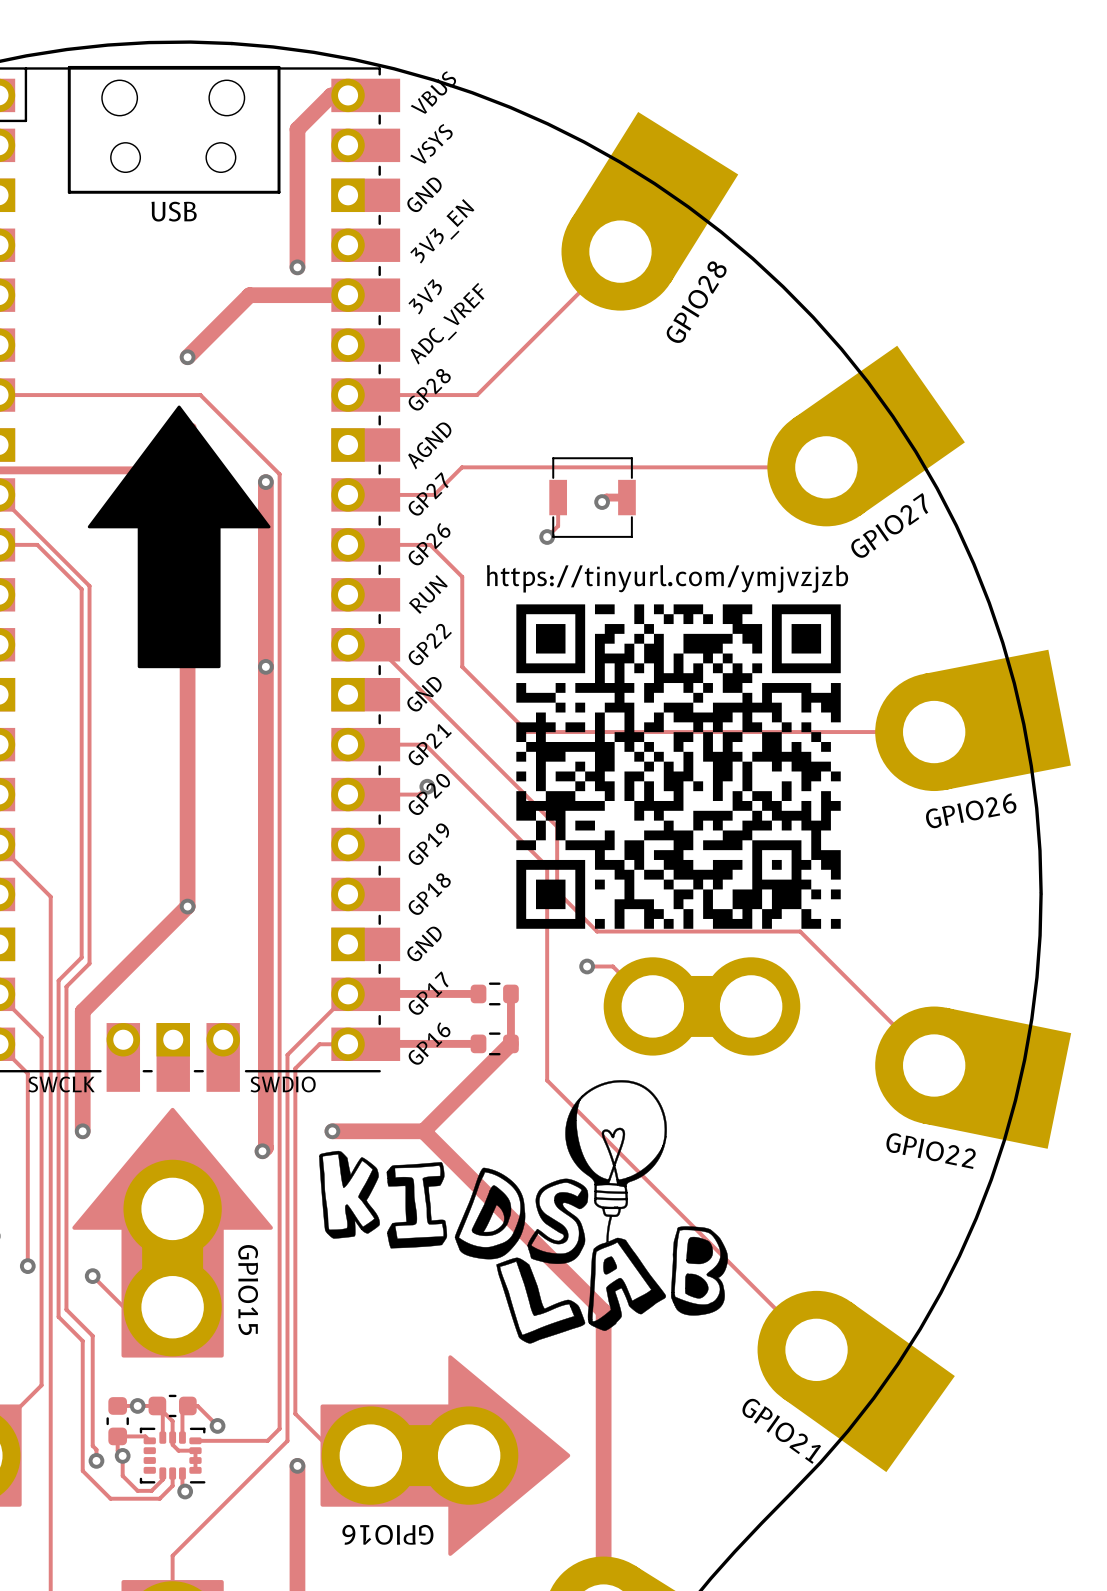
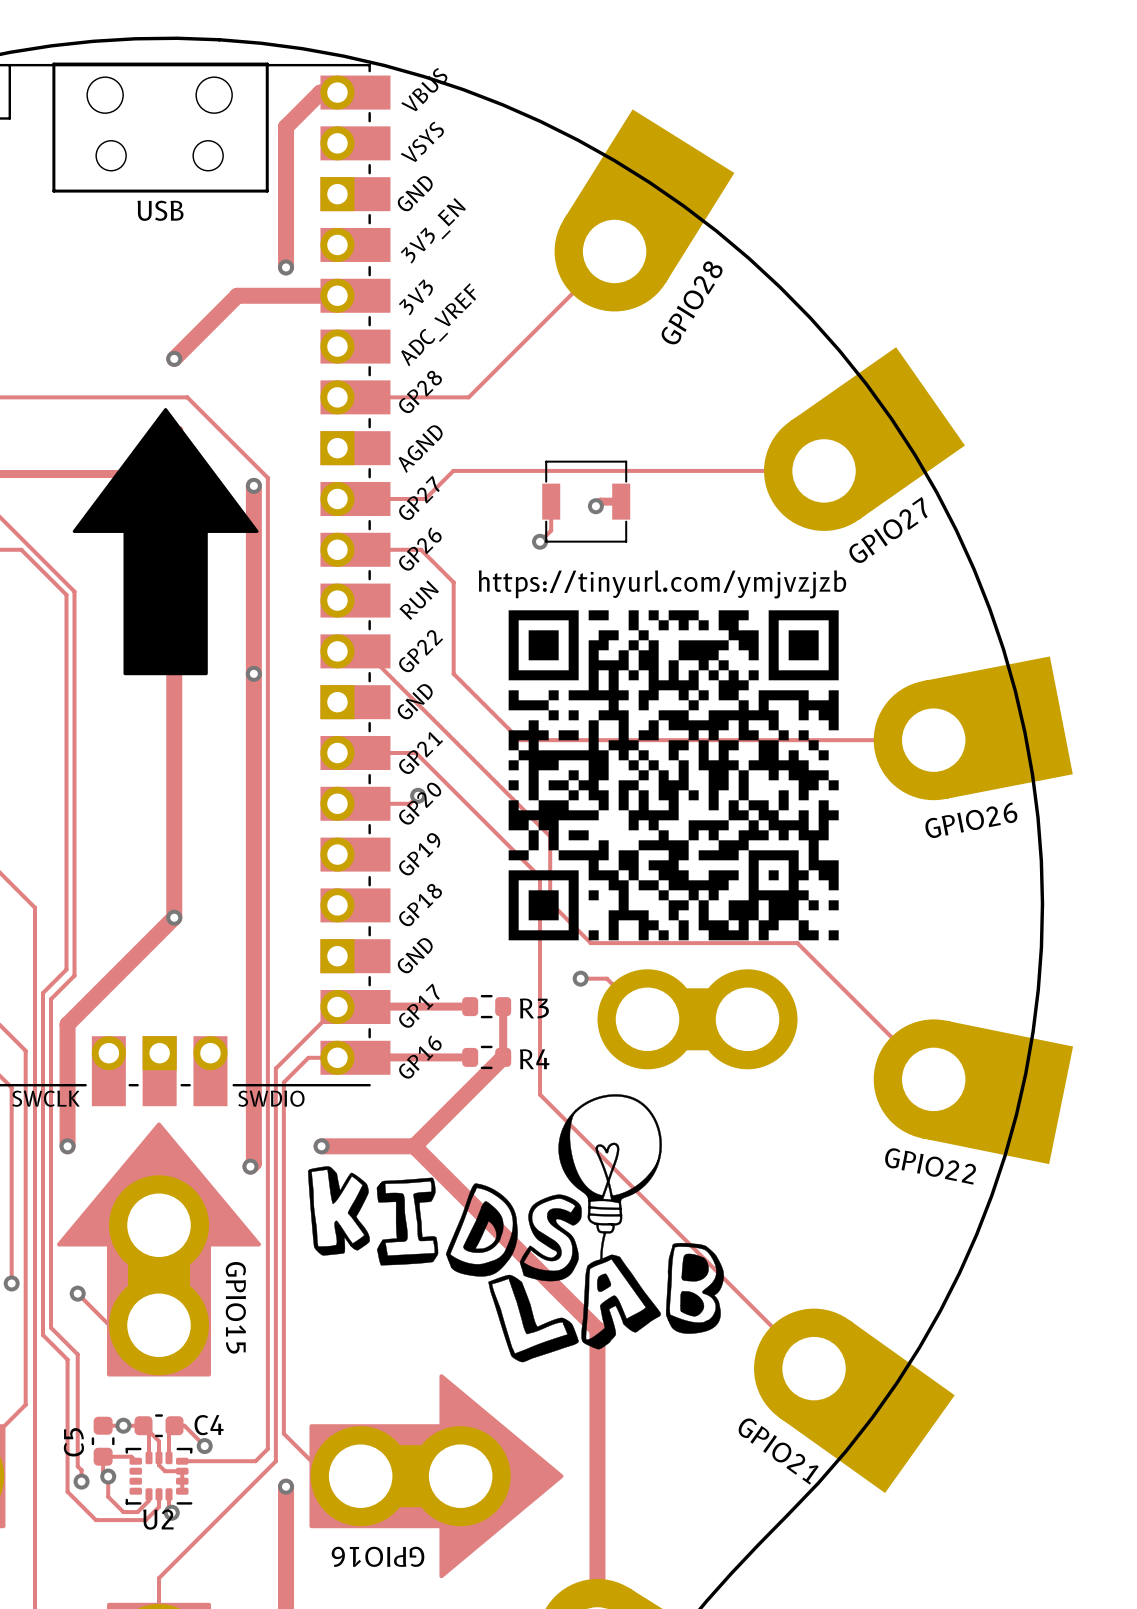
R3 name: none -> R3 (534, 1008)
R4 name: none -> R4 (534, 1059)
C4 name: none -> C4 (209, 1425)
C5 name: none -> C5 (73, 1442)
U2 name: none -> U2 (158, 1519)

